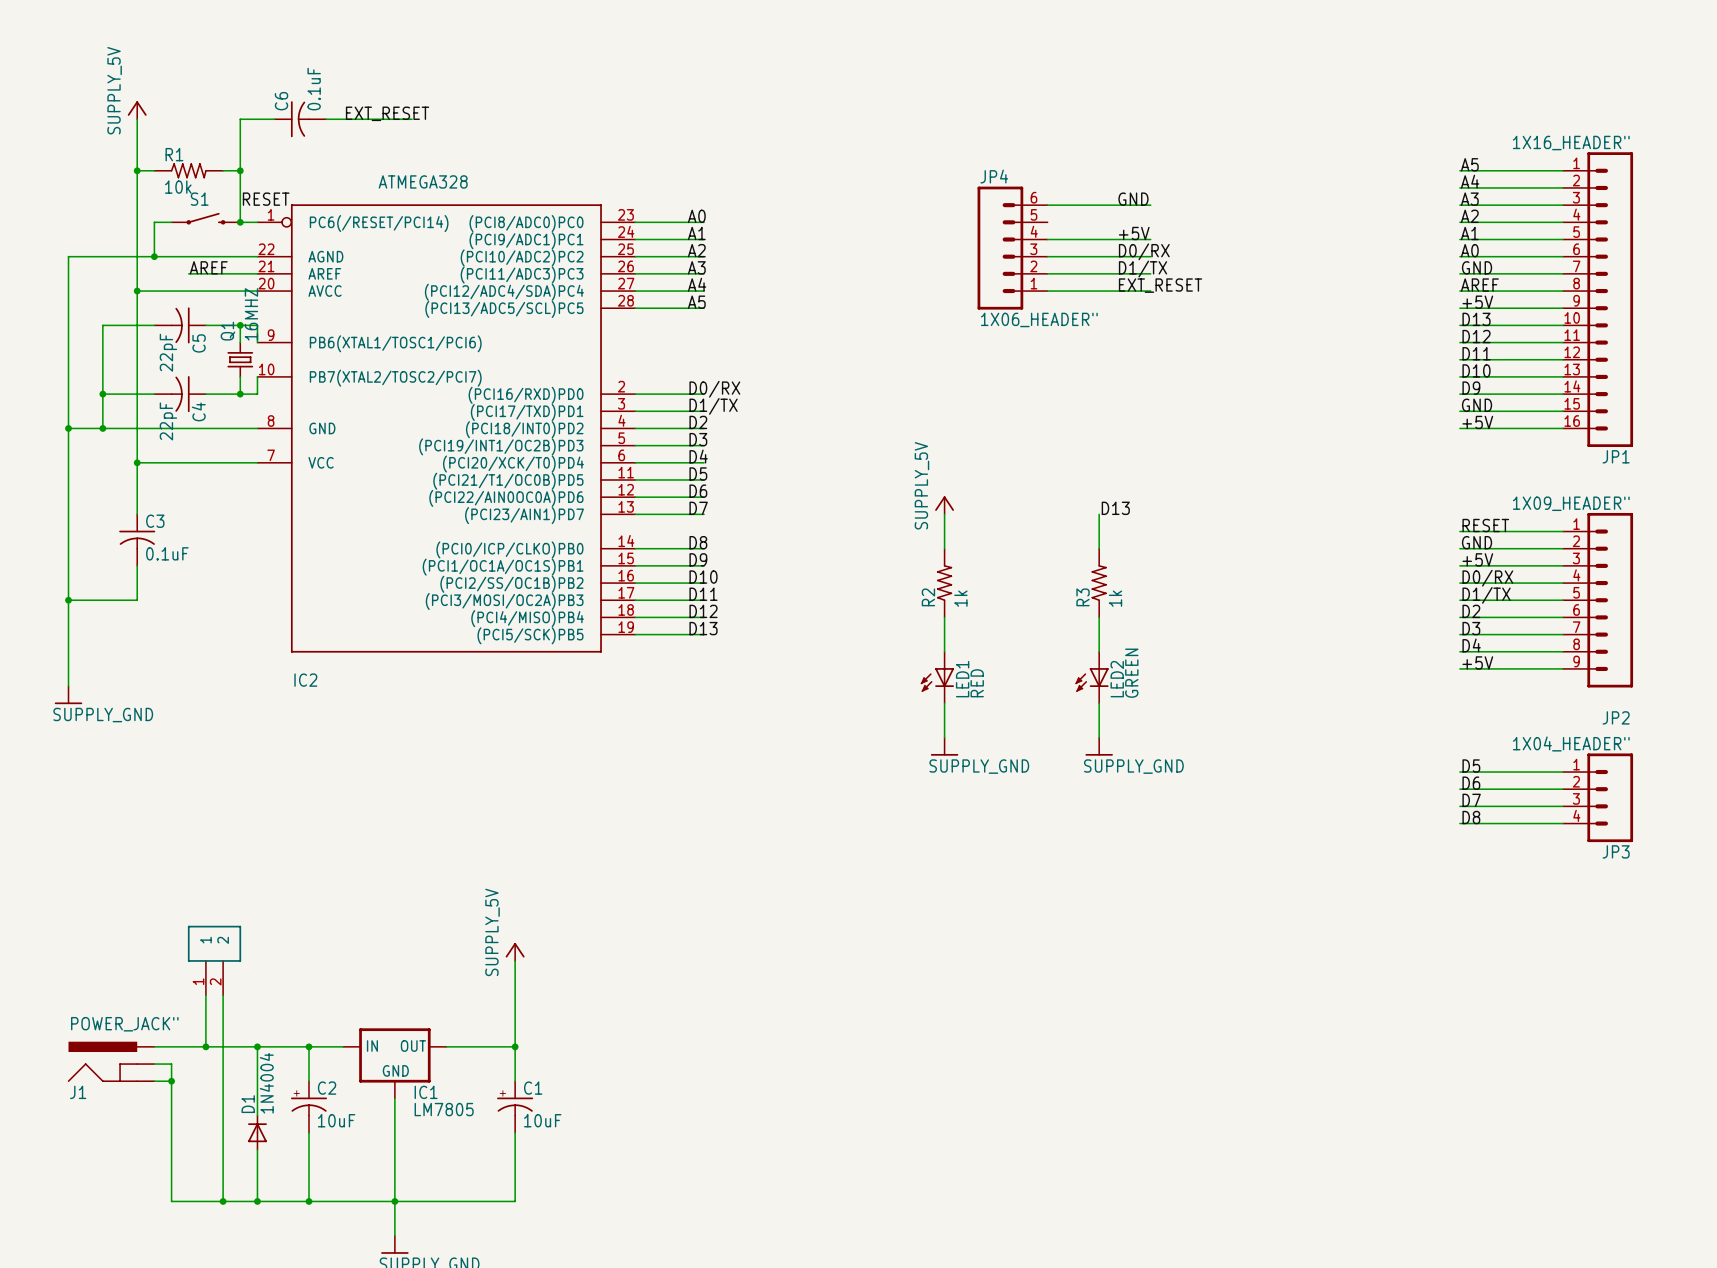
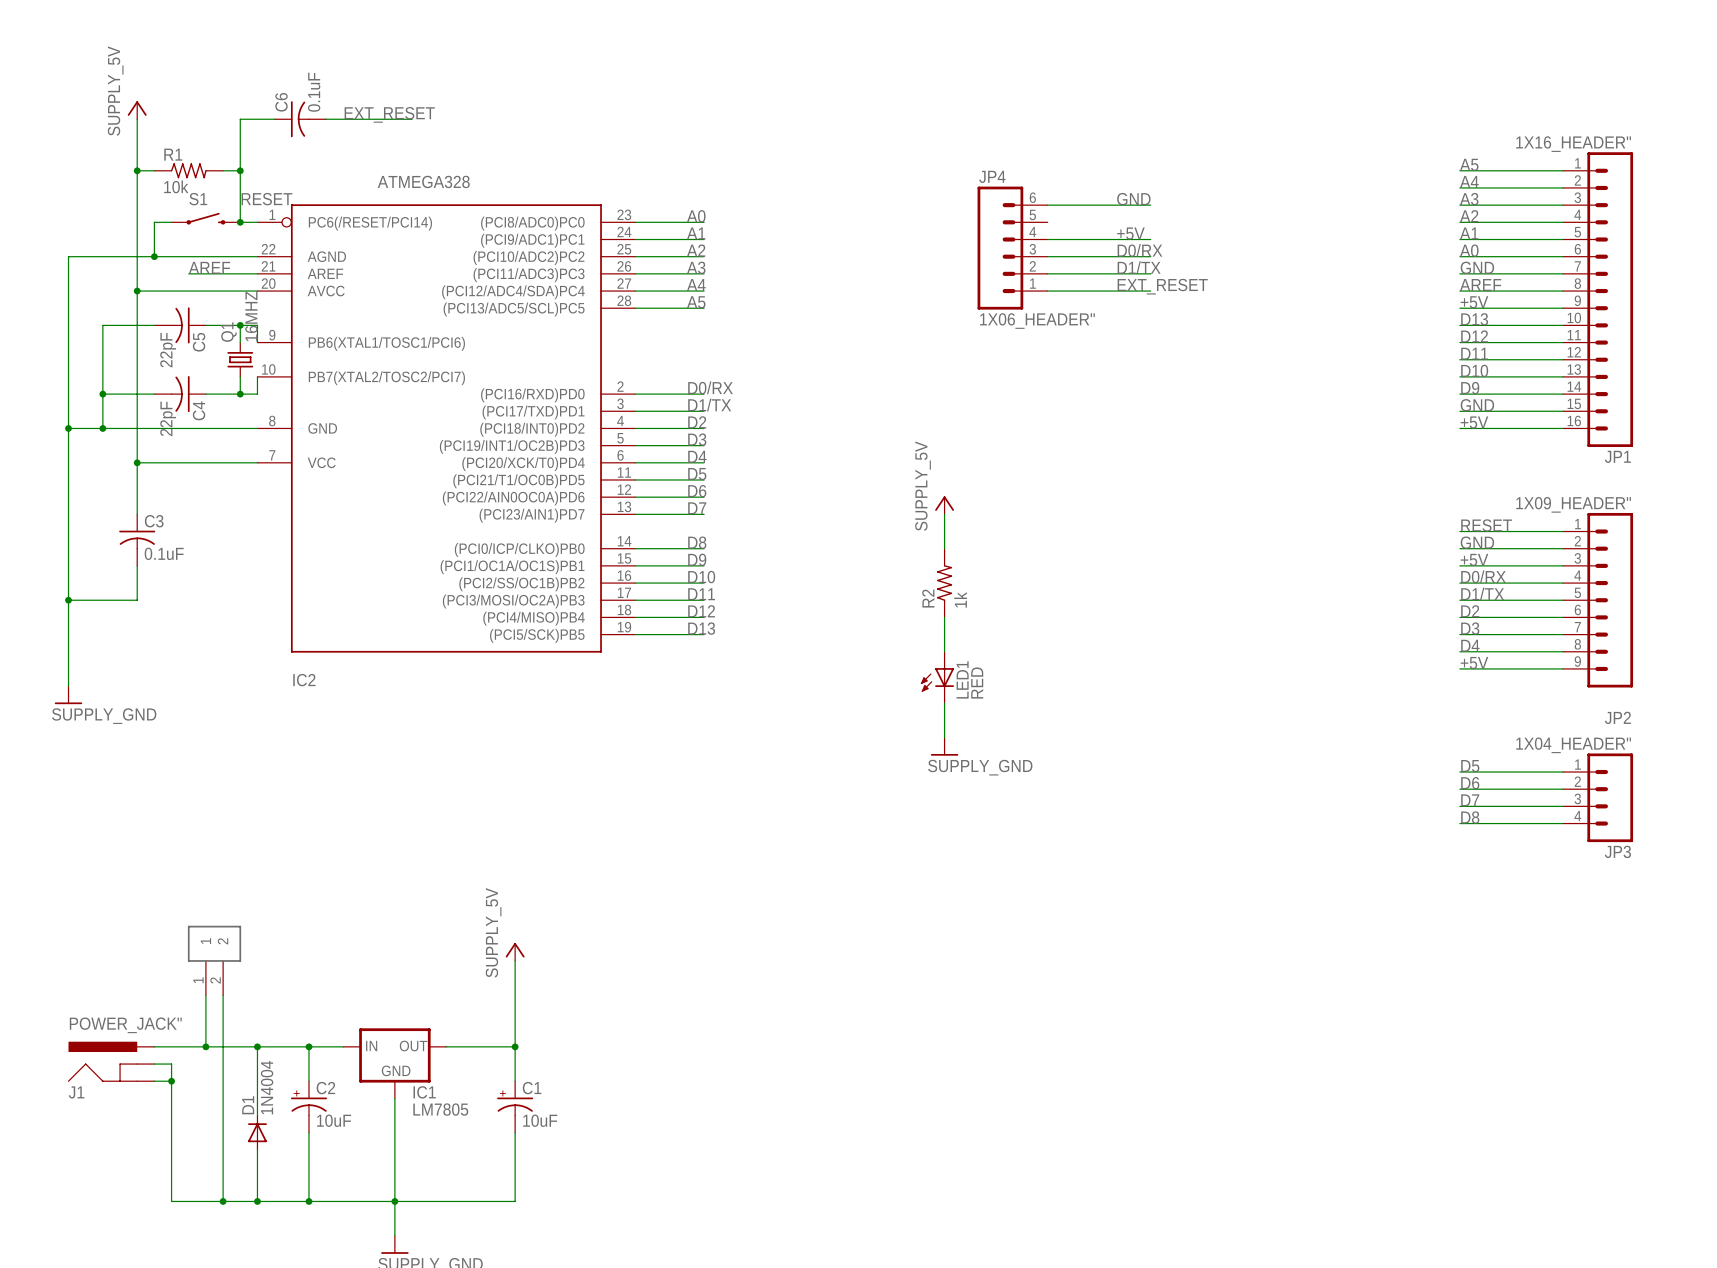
label: D13 (1115, 508) -> none
wire: (1099, 514) (1099, 548) -> none
R3: 1k (1099, 583) -> none
wire: (1099, 617) (1099, 651) -> none
LED2: GREEN (1092, 677) -> none
wire: (1099, 703) (1099, 737) -> none
power symbol: SUPPLY_GND (1099, 746) -> none

